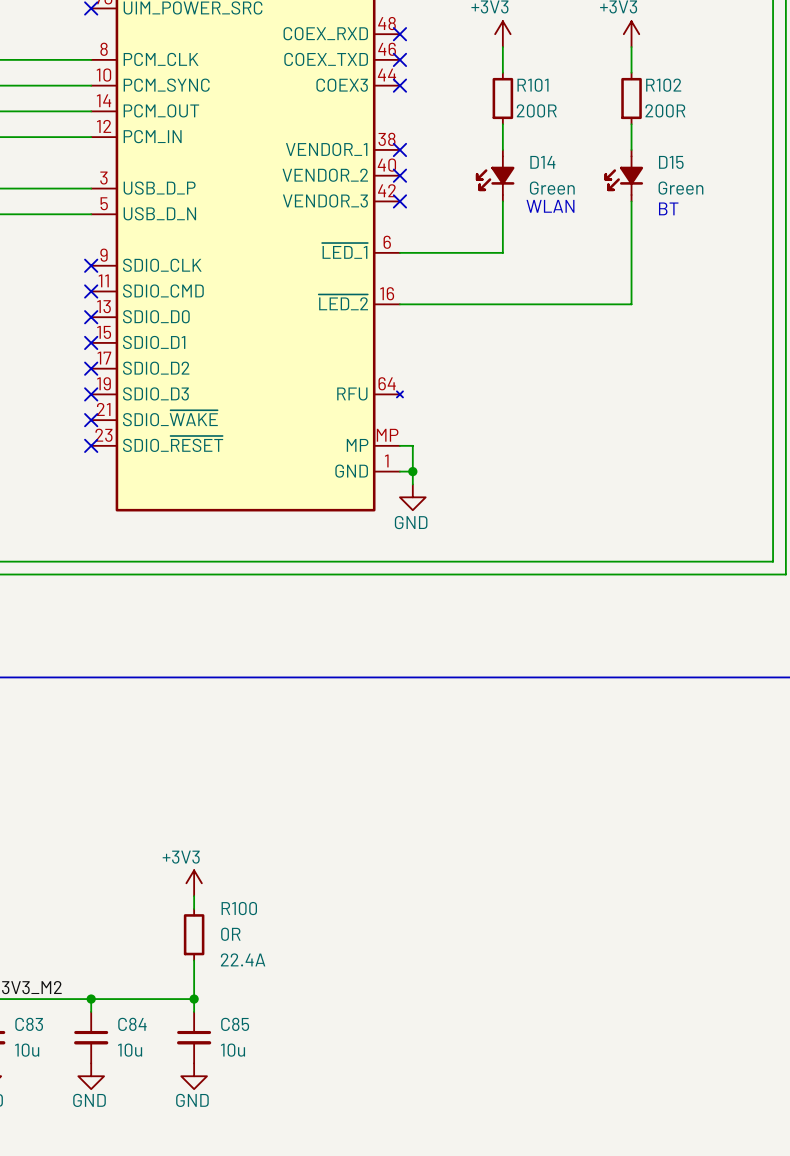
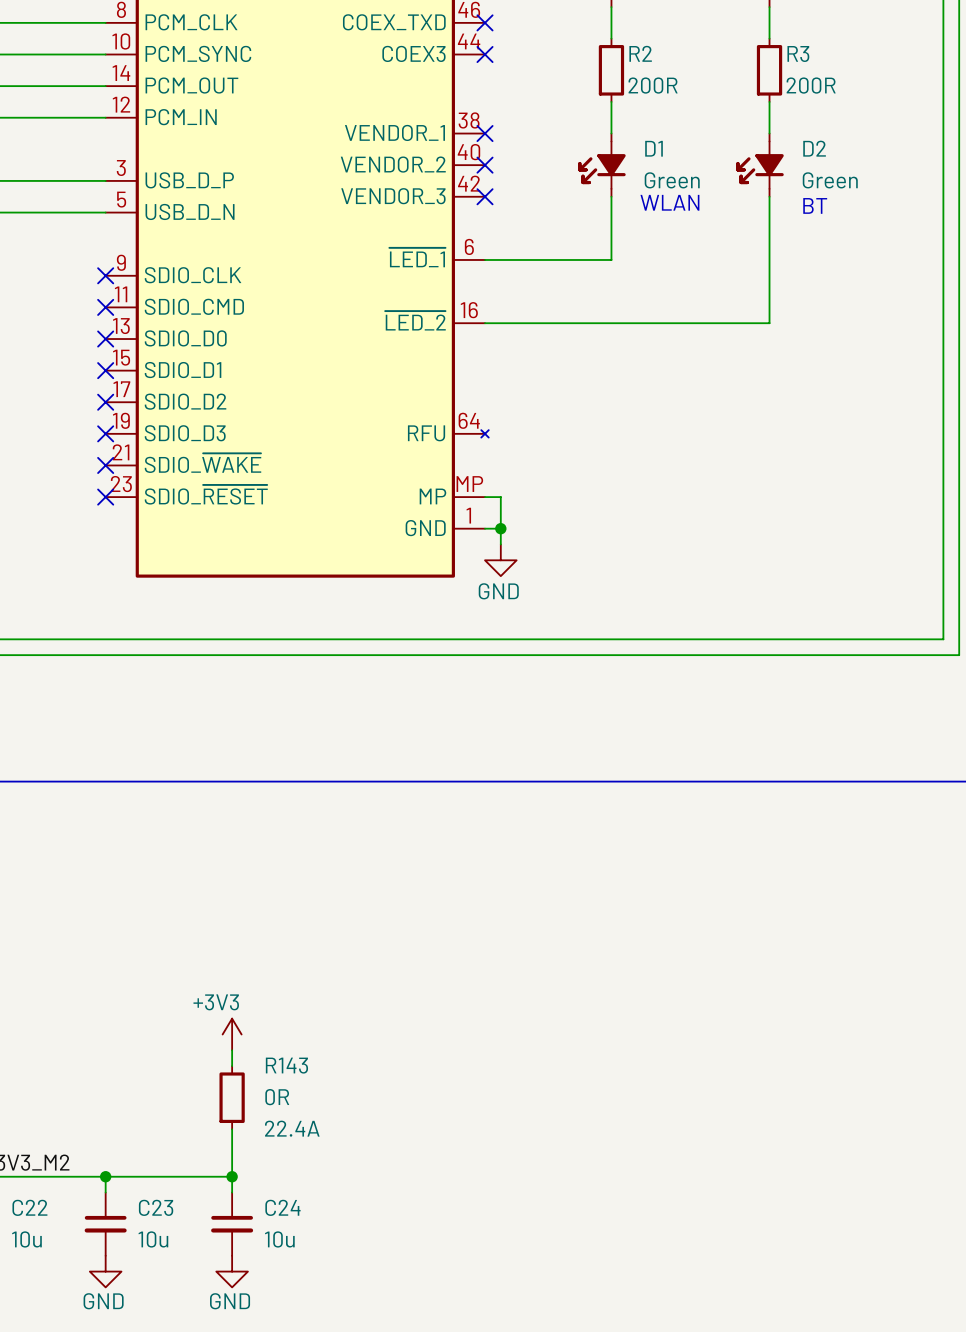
R101 name: R101 (533, 85) -> R2 (640, 53)
R102 name: R102 (663, 85) -> R3 (798, 54)
D14 name: D14 (542, 162) -> D1 (654, 148)
D15 name: D15 (671, 162) -> D2 (814, 148)
R100 name: R100 (239, 908) -> R143 (286, 1065)
C83 name: C83 (29, 1024) -> C22 (29, 1207)
C84 name: C84 (132, 1024) -> C23 (156, 1207)
C85 name: C85 (235, 1024) -> C24 (282, 1207)

